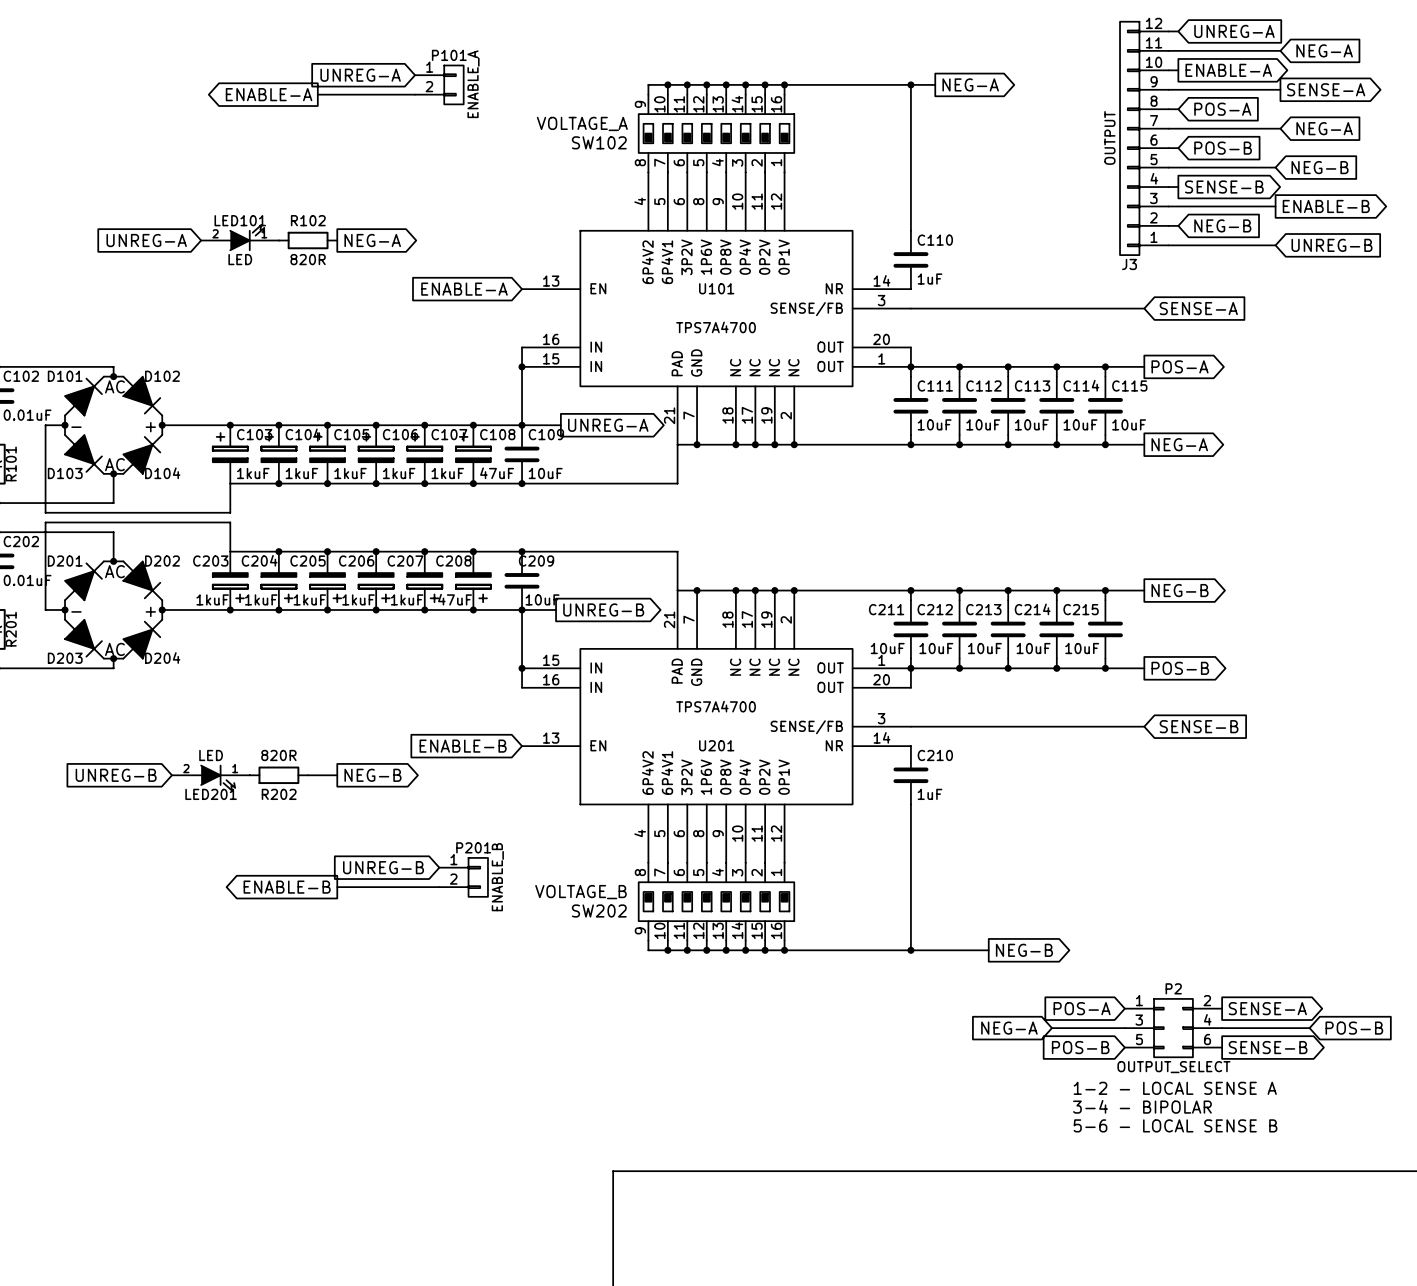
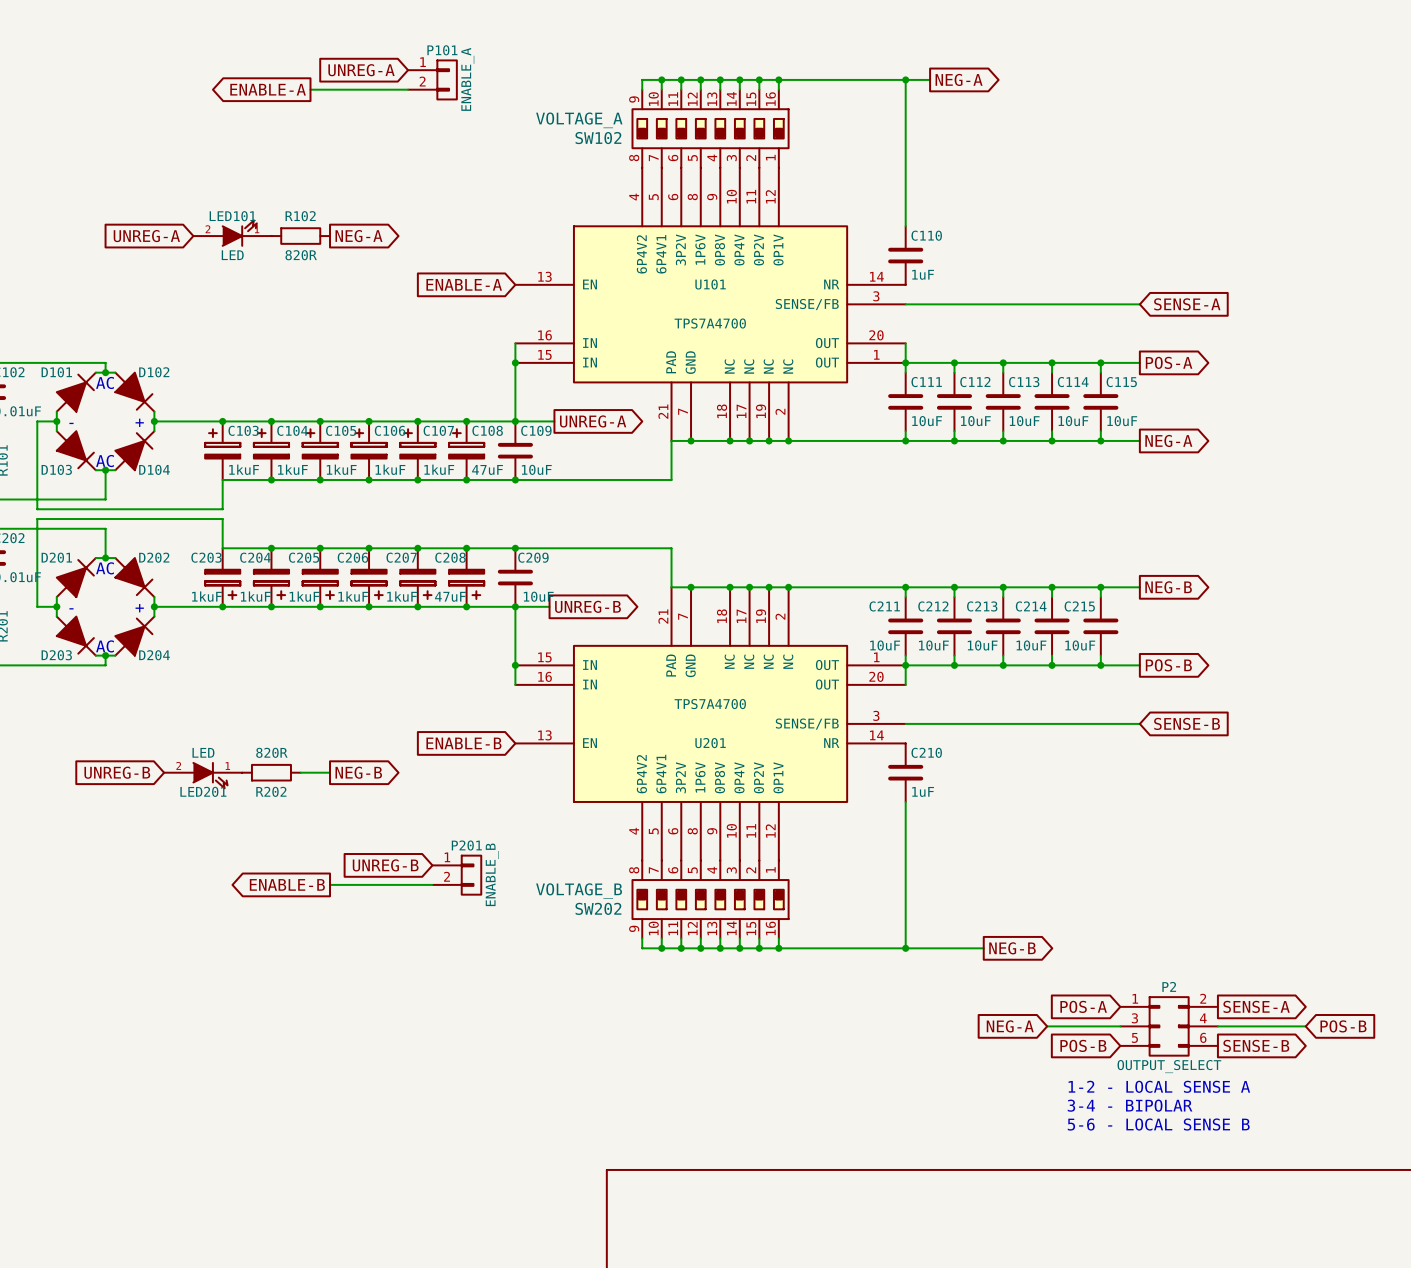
wire: (1168, 31) (1178, 31) -> none
global label: UNREG-A (1234, 31) -> none
wire: (1168, 50) (1280, 50) -> none
global label: NEG-A (1324, 50) -> none
wire: (1168, 70) (1178, 70) -> none
global label: ENABLE-A (1228, 70) -> none
wire: (1168, 89) (1280, 89) -> none
global label: SENSE-A (1326, 89) -> none
wire: (1168, 109) (1178, 109) -> none
global label: POS-A (1222, 109) -> none
wire: (1168, 128) (1280, 128) -> none
global label: NEG-A (1324, 128) -> none
J3: OUTPUT (1144, 138) -> none
wire: (1168, 148) (1178, 148) -> none
global label: POS-B (1223, 148) -> none
wire: (1168, 167) (1275, 167) -> none
global label: NEG-B (1320, 167) -> none
wire: (1168, 187) (1178, 187) -> none
global label: SENSE-B (1224, 187) -> none
wire: (1168, 206) (1275, 206) -> none
global label: ENABLE-B (1326, 206) -> none
wire: (1168, 225) (1178, 225) -> none
global label: NEG-B (1222, 225) -> none
wire: (1168, 245) (1275, 245) -> none
global label: UNREG-B (1331, 245) -> none

